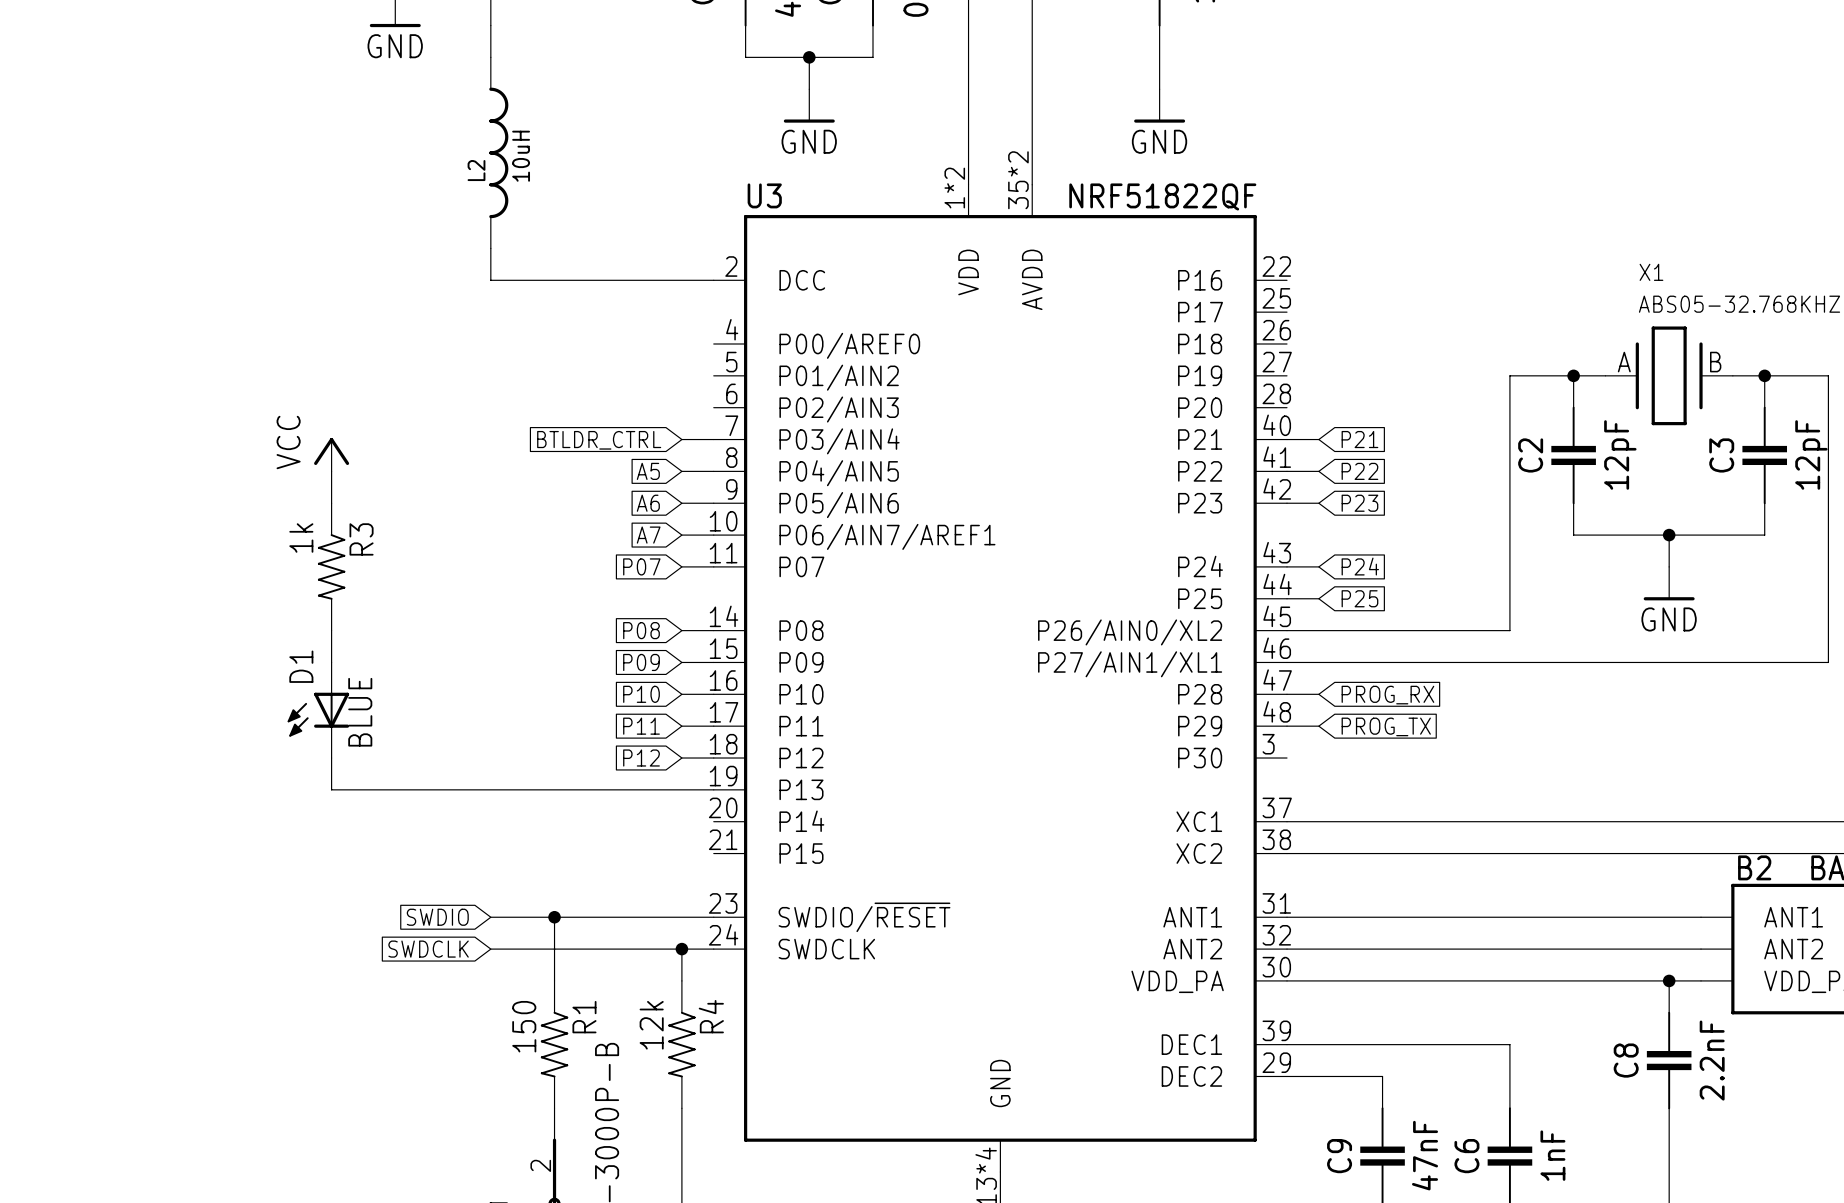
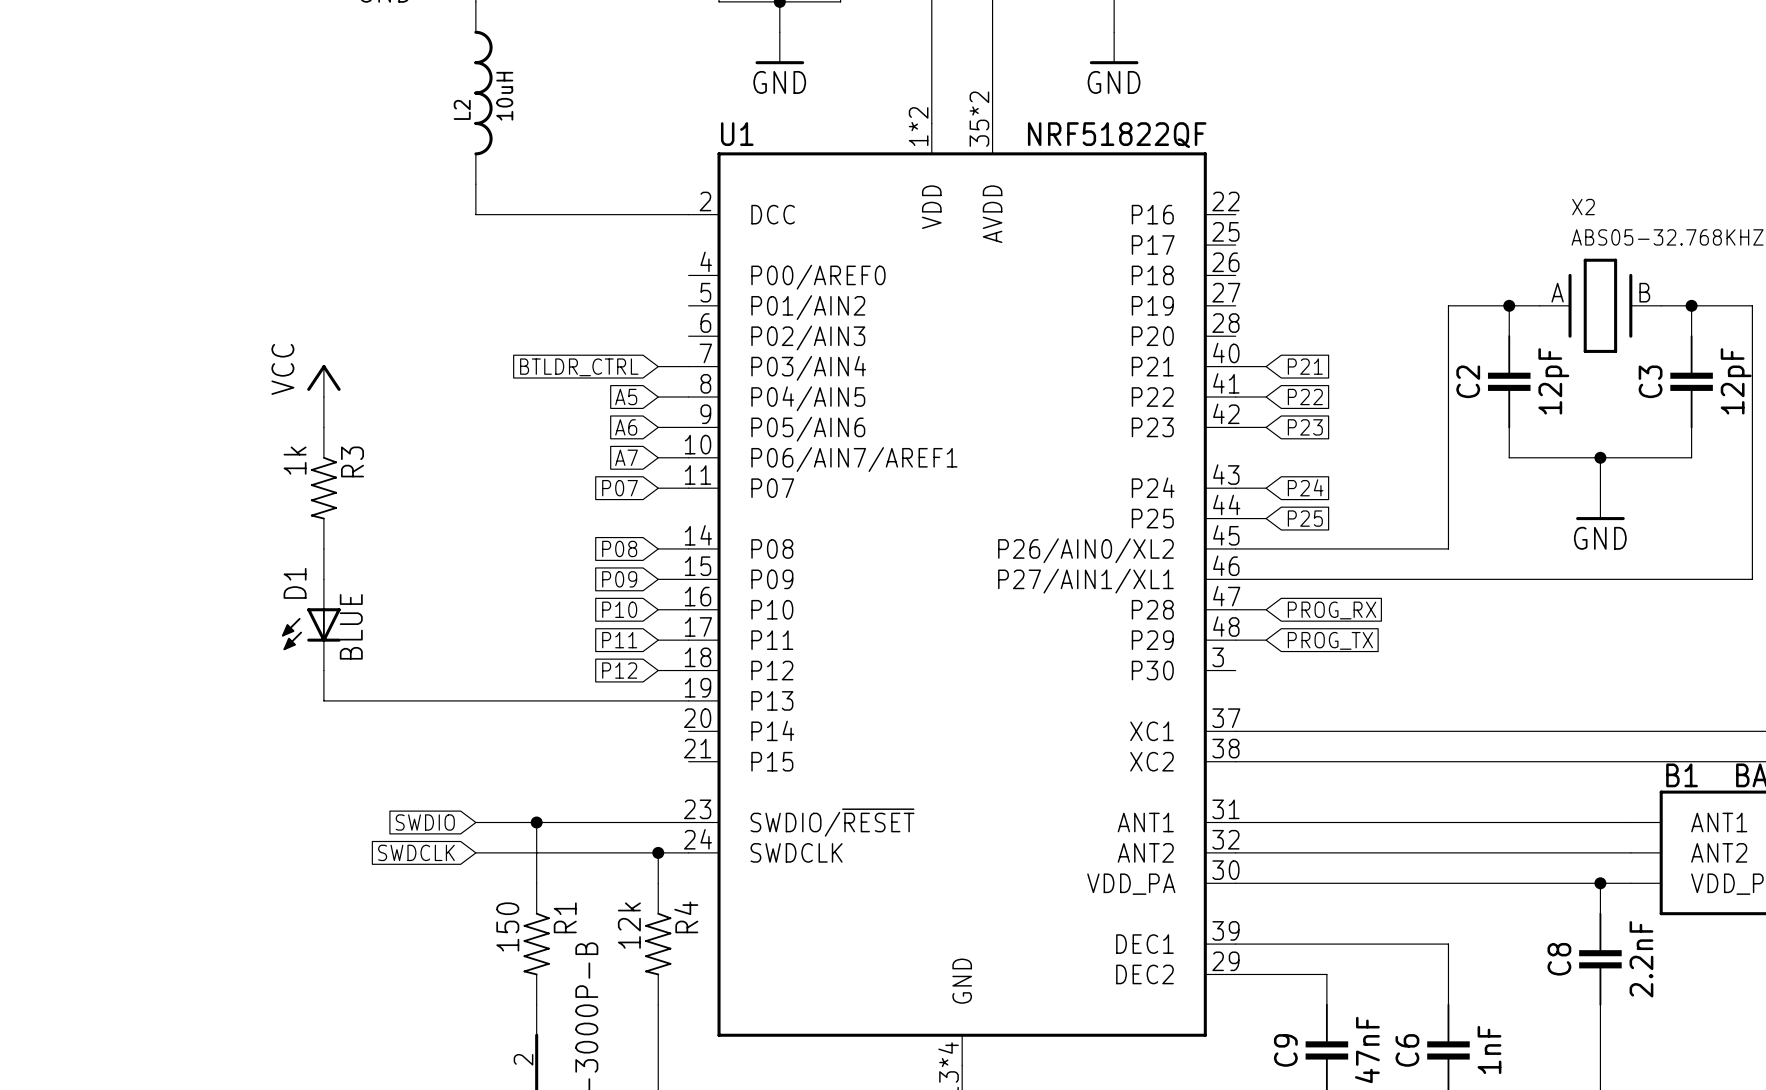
U3 name: U3 (764, 195) -> U1 (737, 134)
X1 name: X1 (1651, 272) -> X2 (1583, 207)
B2 name: B2 (1754, 867) -> B1 (1682, 775)

